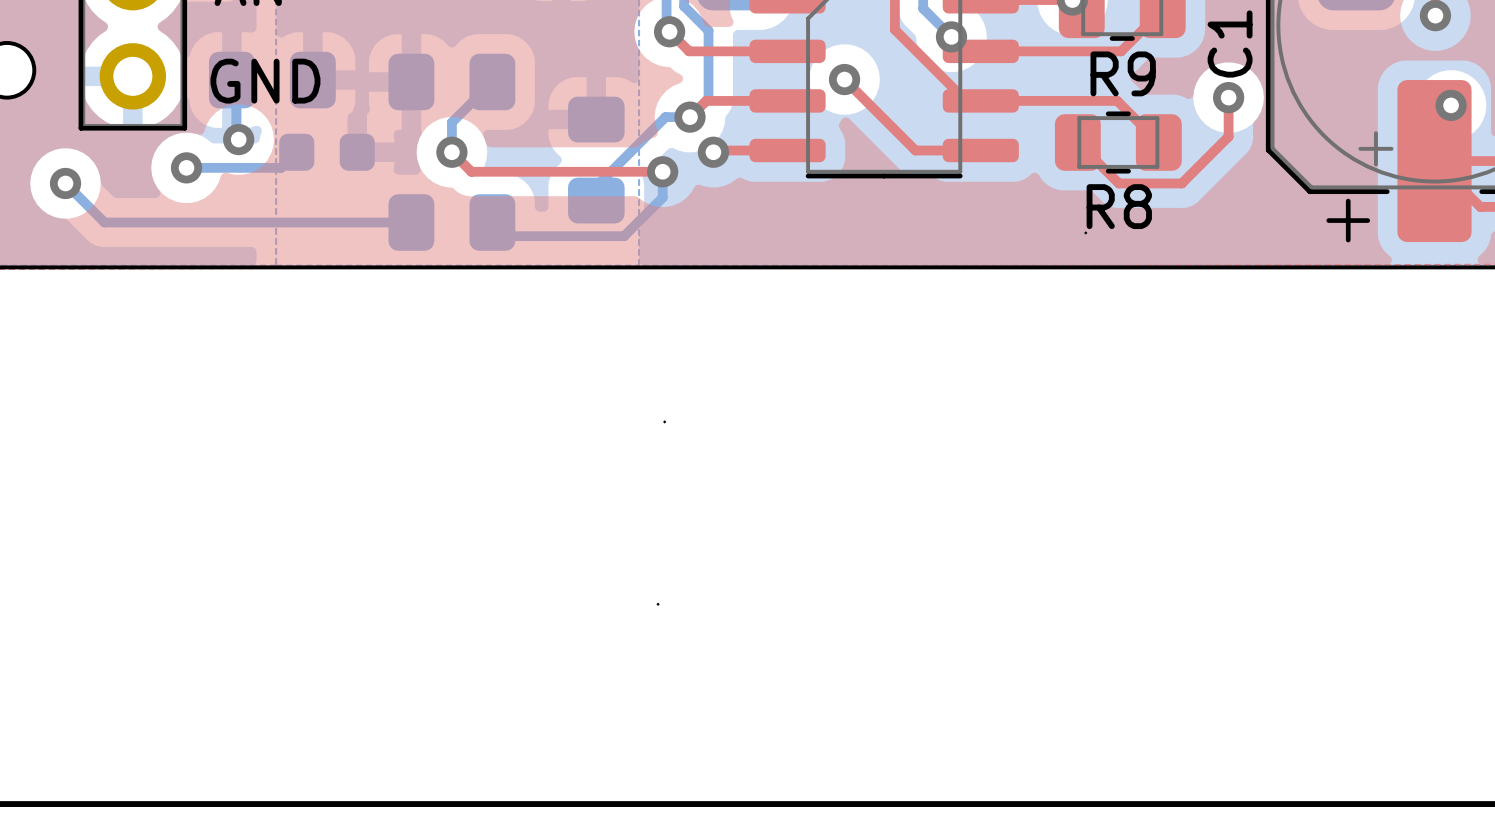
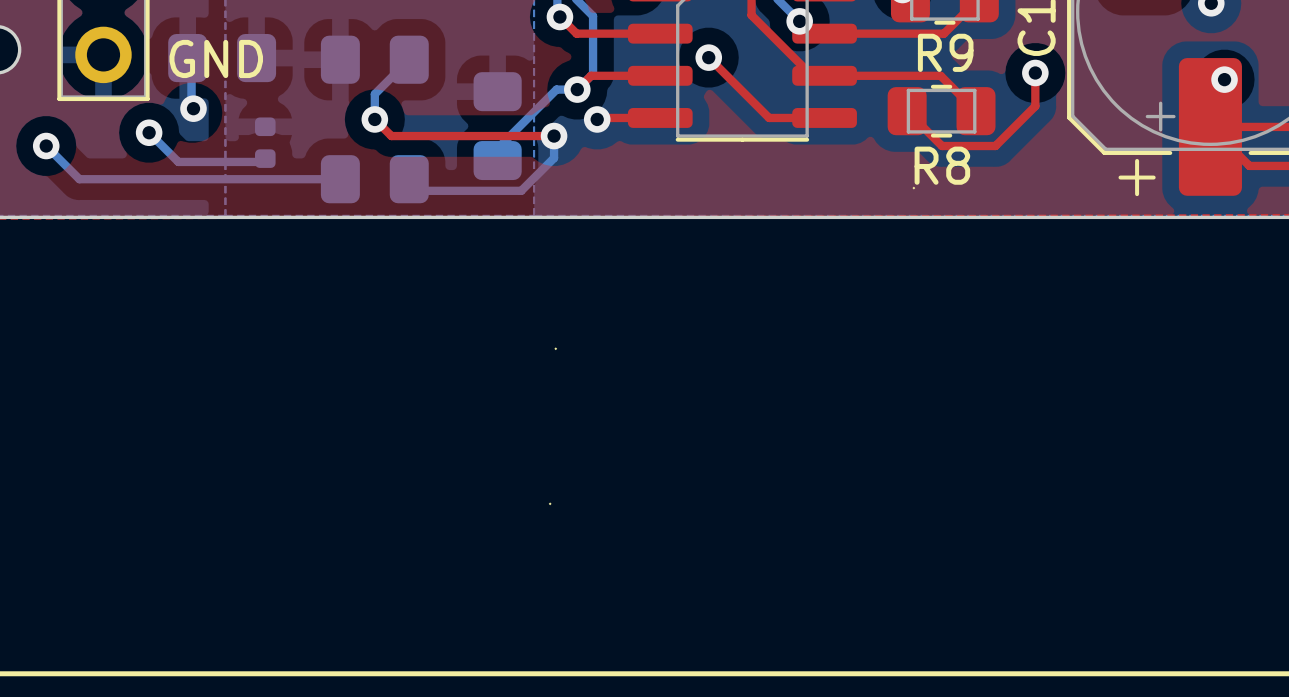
part footprint: [279, 133, 375, 171] -> [255, 117, 276, 168]
bottom track: (296, 152) (281, 167) (186, 167) -> (268, 161) (178, 161) (149, 132)

